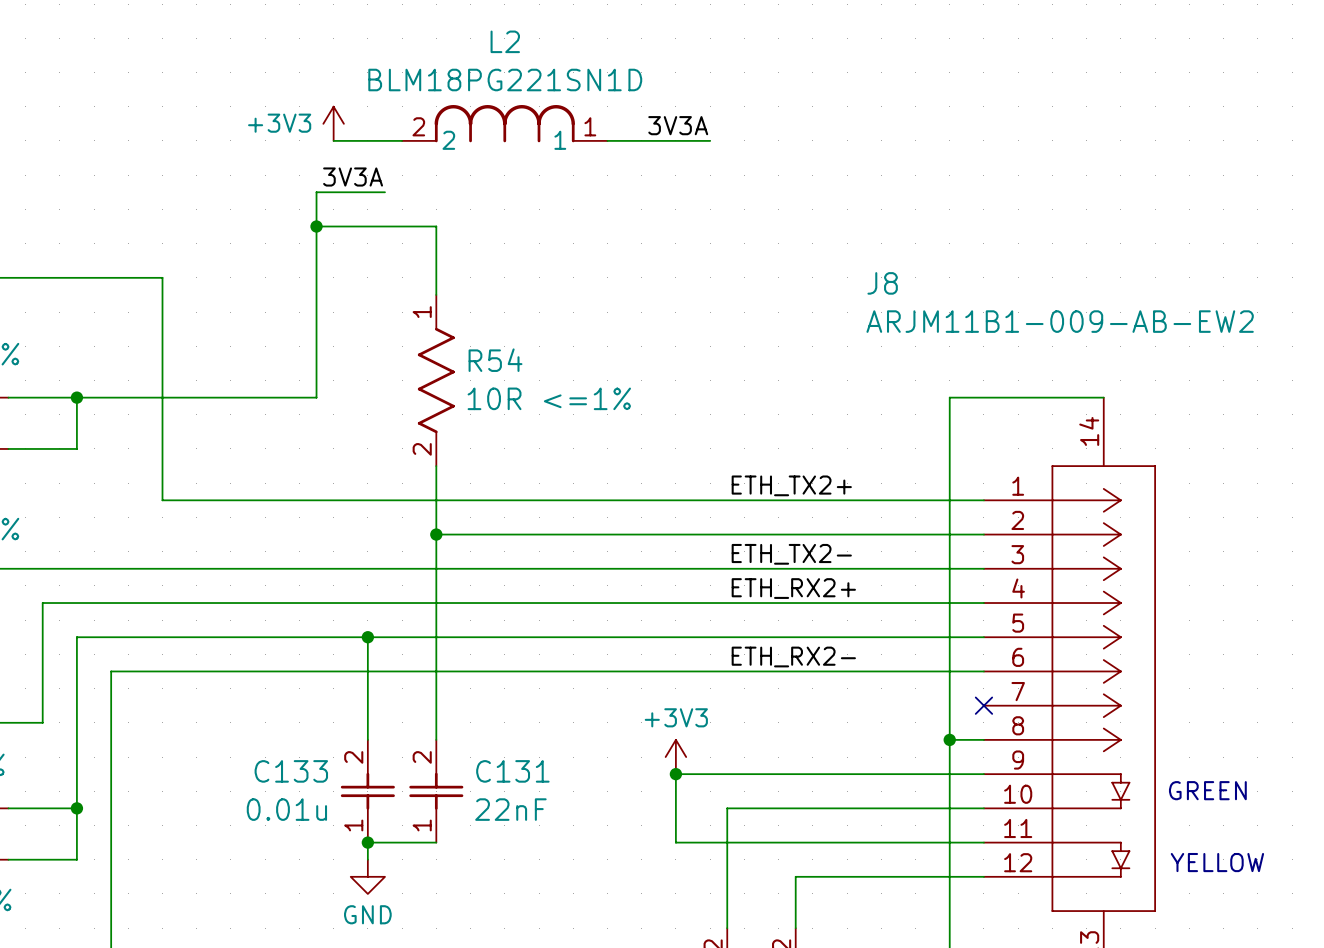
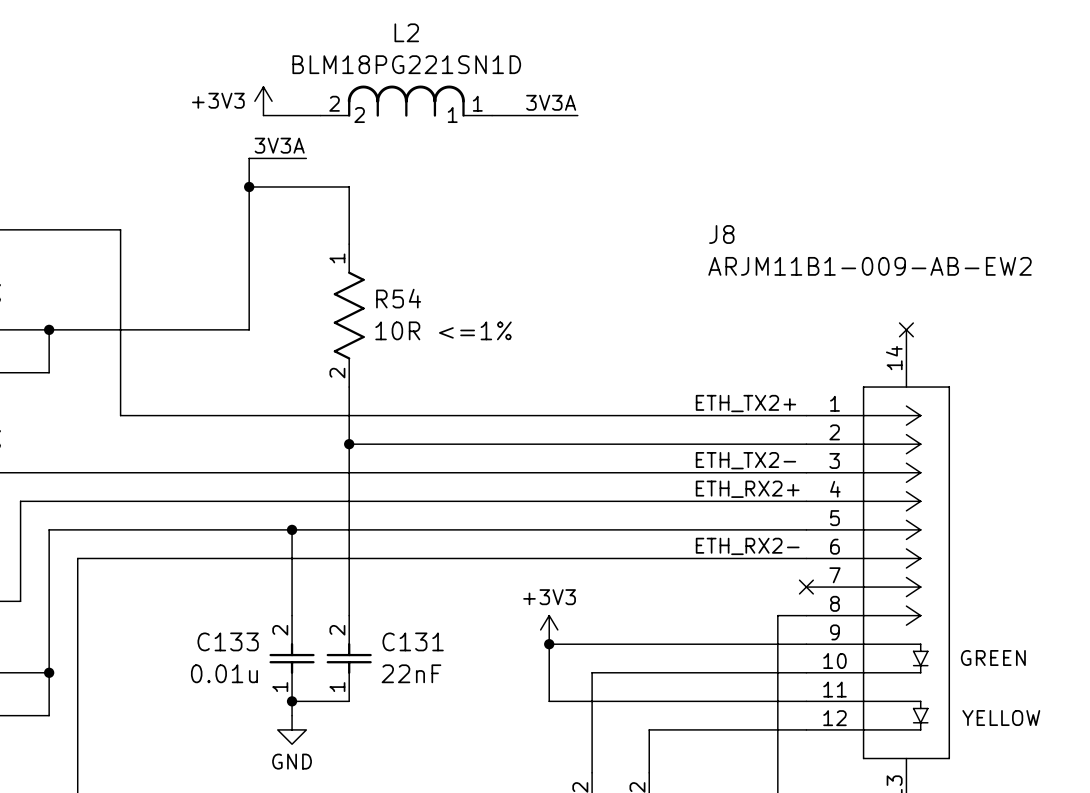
wire: (1103, 397) (949, 397) (949, 739) -> none
no-connect mark: none -> (906, 329)
label position: ETH_TX2+ (791, 485) -> ETH_TX2+ (745, 403)
label position: ETH_TX2- (791, 554) -> ETH_TX2- (745, 460)
label position: ETH_RX2+ (793, 588) -> ETH_RX2+ (747, 489)
label position: ETH_RX2- (793, 657) -> ETH_RX2- (747, 546)
junction: (949, 739) -> none

